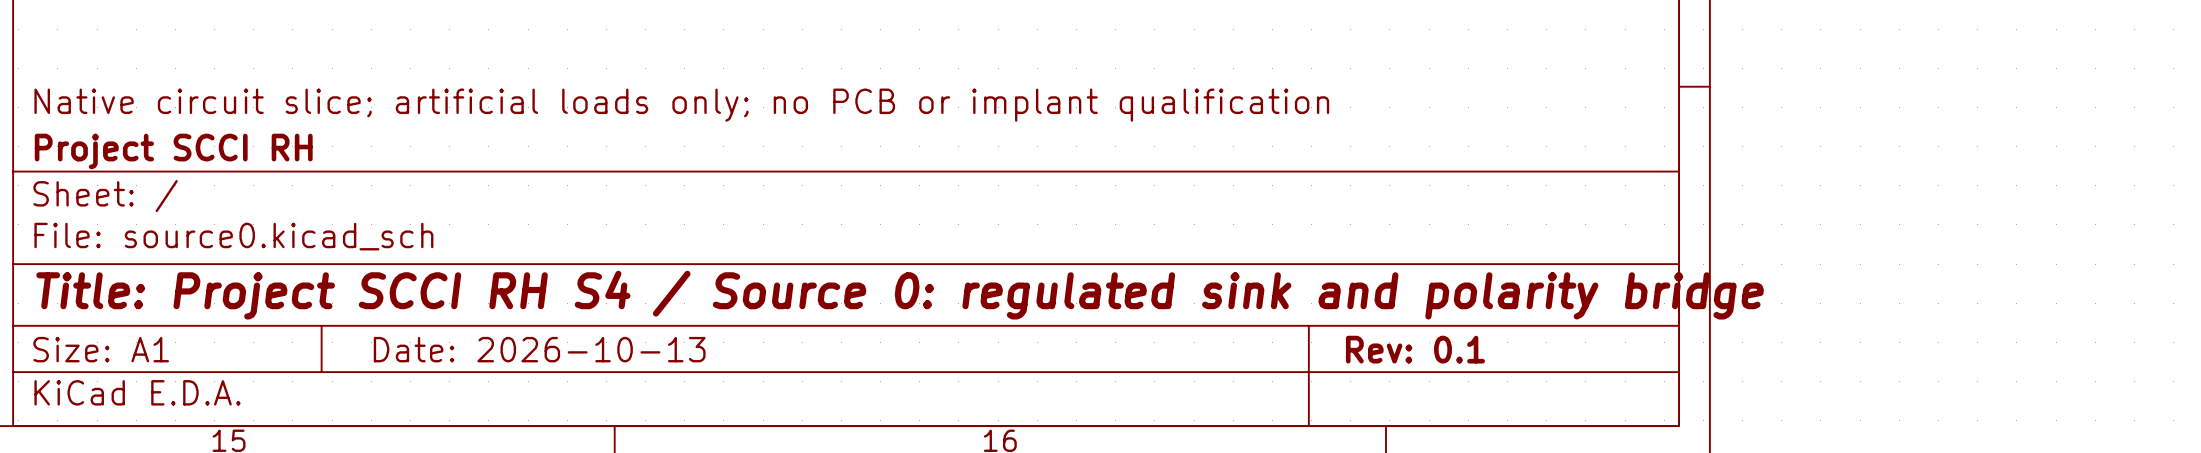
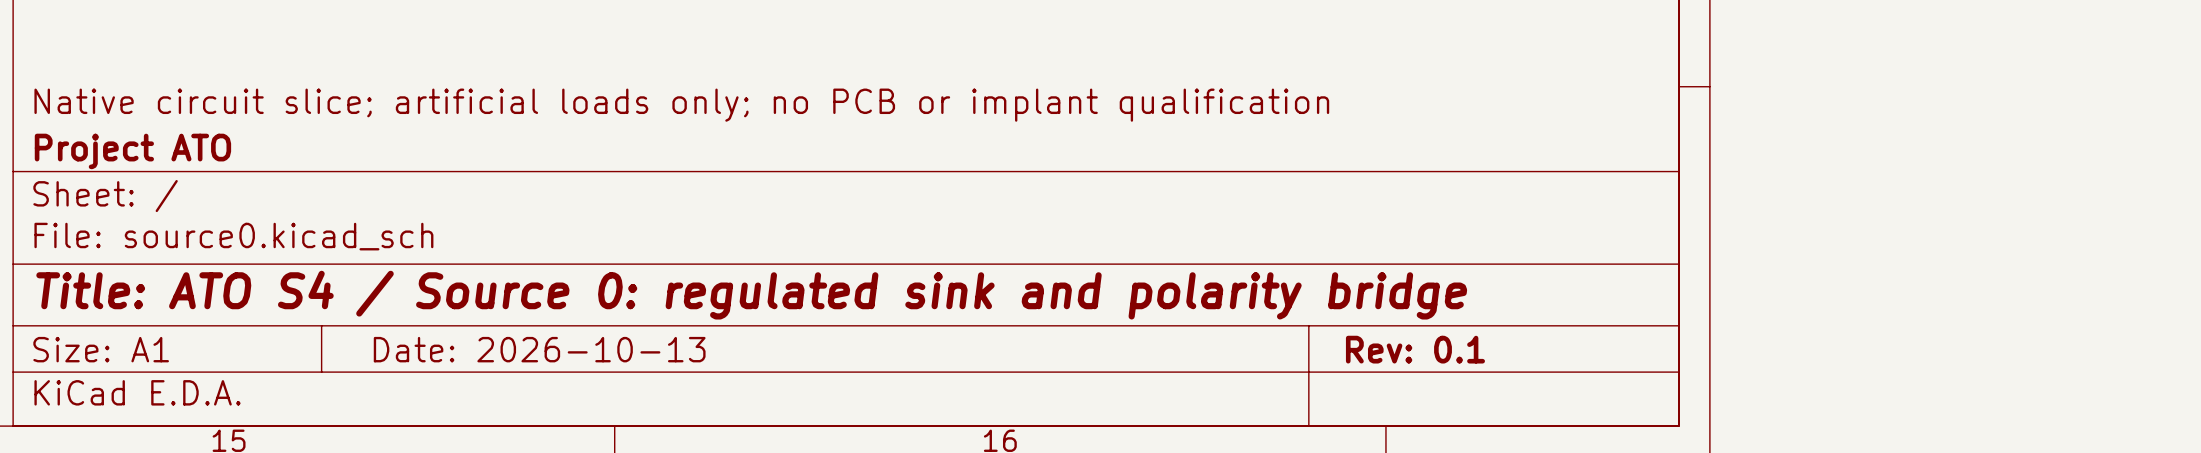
title block: Project SCCI RH (173, 151) -> Project ATO (132, 151)
title block: Title: Project SCCI RH S4 / Source 0: regulated sink and polarity bridge (900, 295) -> Title: ATO S4 / Source 0: regulated sink and polarity bridge (751, 295)

